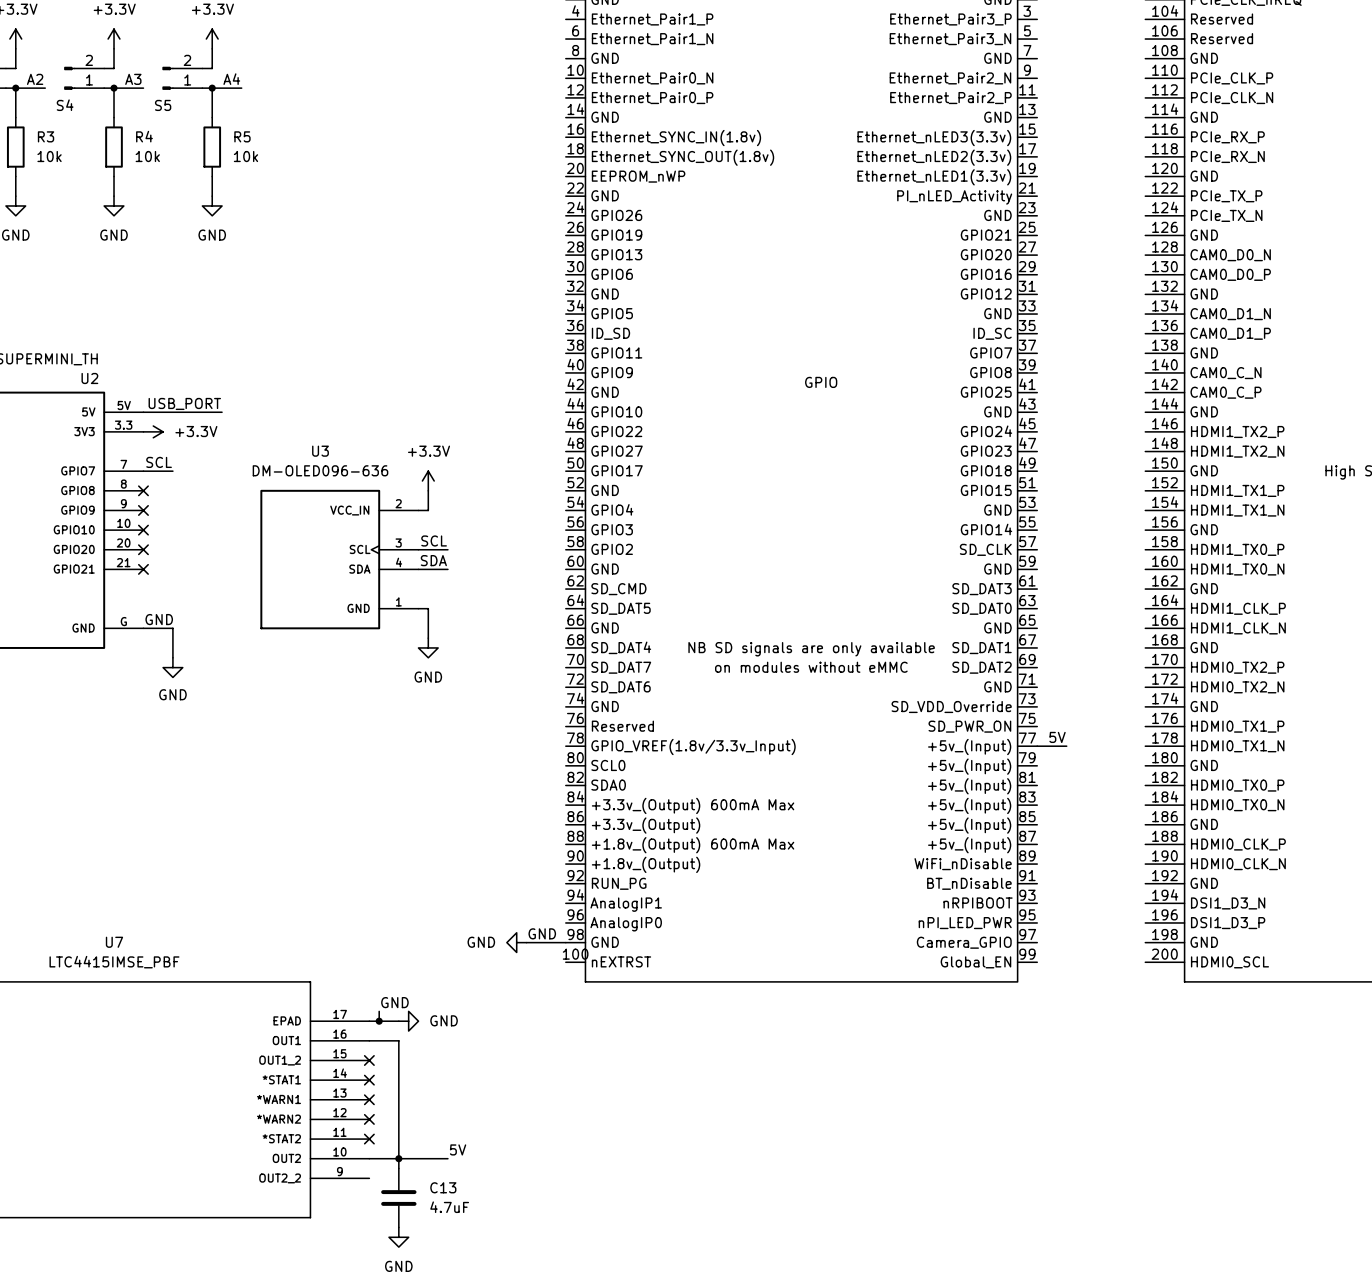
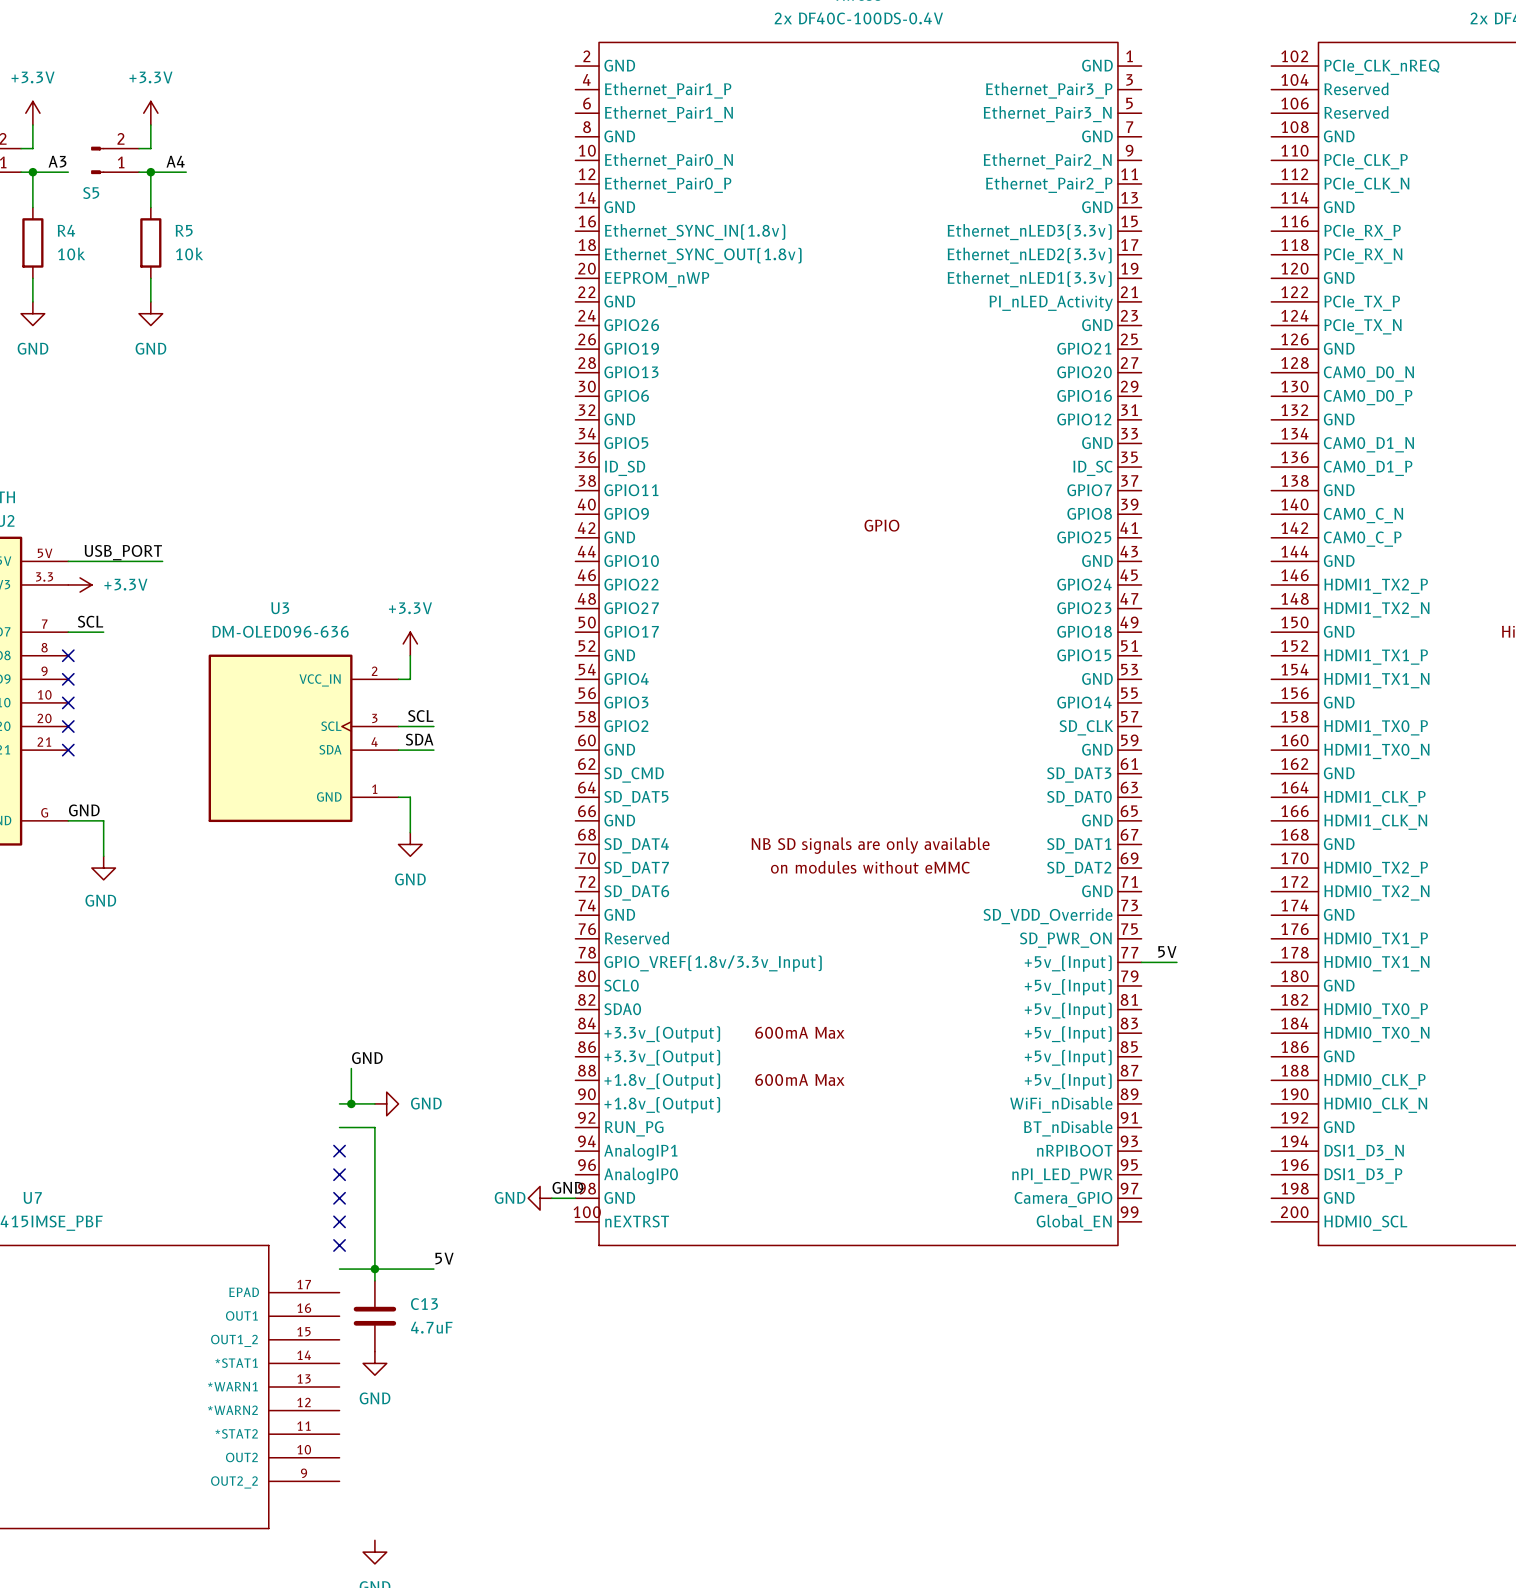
label: none -> GND (367, 1058)
wire: none -> (351, 1068) (351, 1103)
junction: none -> (351, 1103)
power symbol: none -> GND (386, 1103)
no-connect mark: none -> (339, 1151)
no-connect mark: none -> (339, 1174)
label position: GND (542, 933) -> GND (567, 1187)
no-connect mark: none -> (339, 1198)
power symbol text position: GND (481, 942) -> GND (510, 1197)
power symbol position: GND (516, 942) -> GND (540, 1198)
no-connect mark: none -> (339, 1221)
no-connect mark: none -> (339, 1245)
label: GND (394, 1002) -> none
wire: (379, 1011) (379, 1021) -> none
wire: (369, 1021) (398, 1021) -> (339, 1103) (374, 1103)
junction position: (379, 1021) -> (374, 1269)
power symbol rotation: 0° (408, 1021) -> 90° clockwise (374, 1363)
power symbol position: GND (408, 1021) -> GND (374, 1363)
wire: (369, 1040) (398, 1040) (398, 1168) -> (339, 1127) (374, 1127) (374, 1280)
no-connect mark: (369, 1060) -> none
no-connect mark: (369, 1080) -> none
no-connect mark: (369, 1099) -> none
no-connect mark: (369, 1119) -> none
no-connect mark: (369, 1139) -> none
label position: 5V (458, 1149) -> 5V (444, 1258)
wire: (369, 1158) (447, 1158) -> (339, 1269) (433, 1269)
junction: (398, 1158) -> none
C13 position: (398, 1197) -> (374, 1316)

